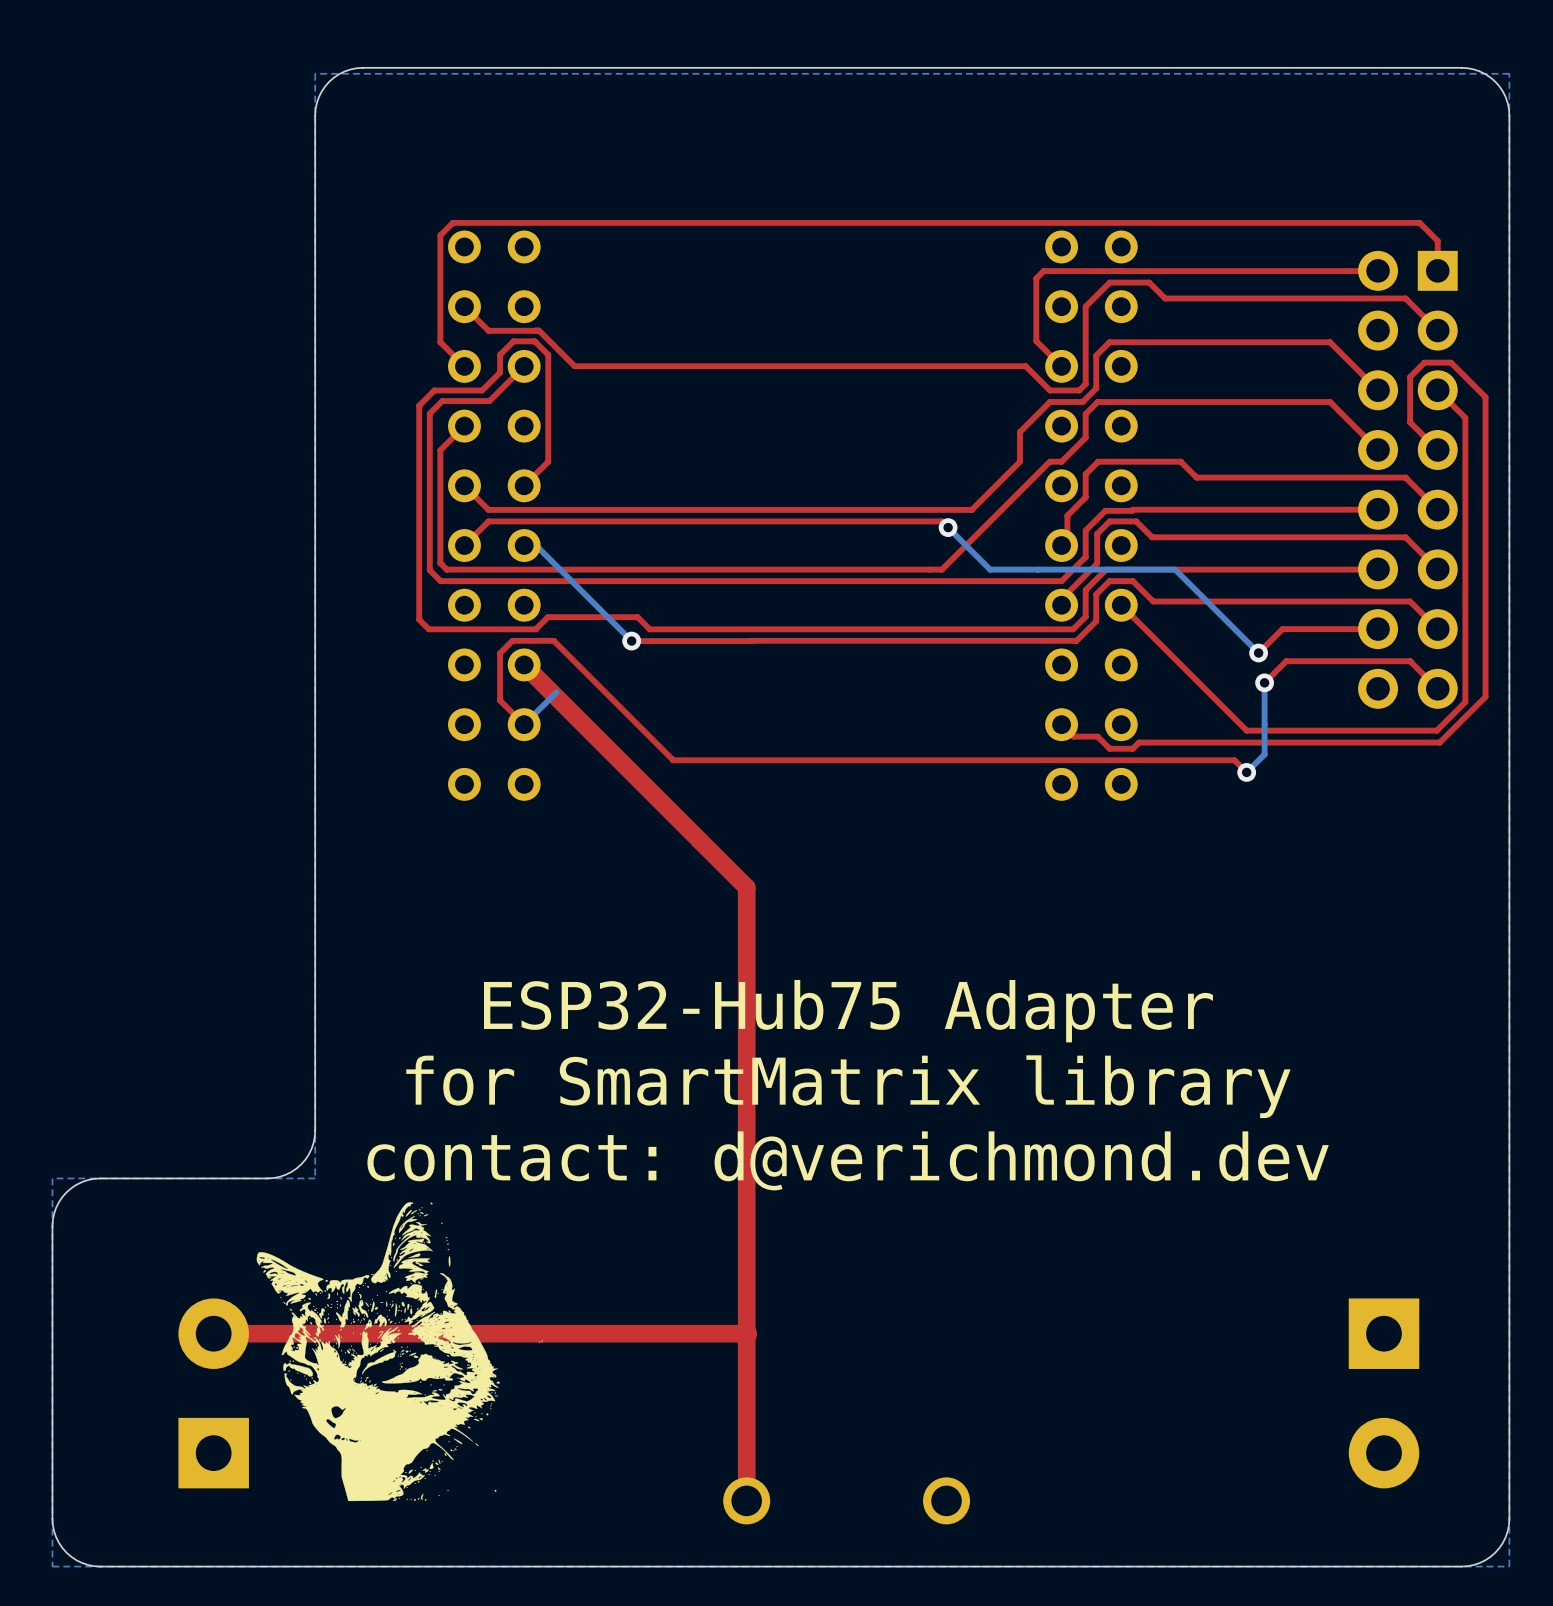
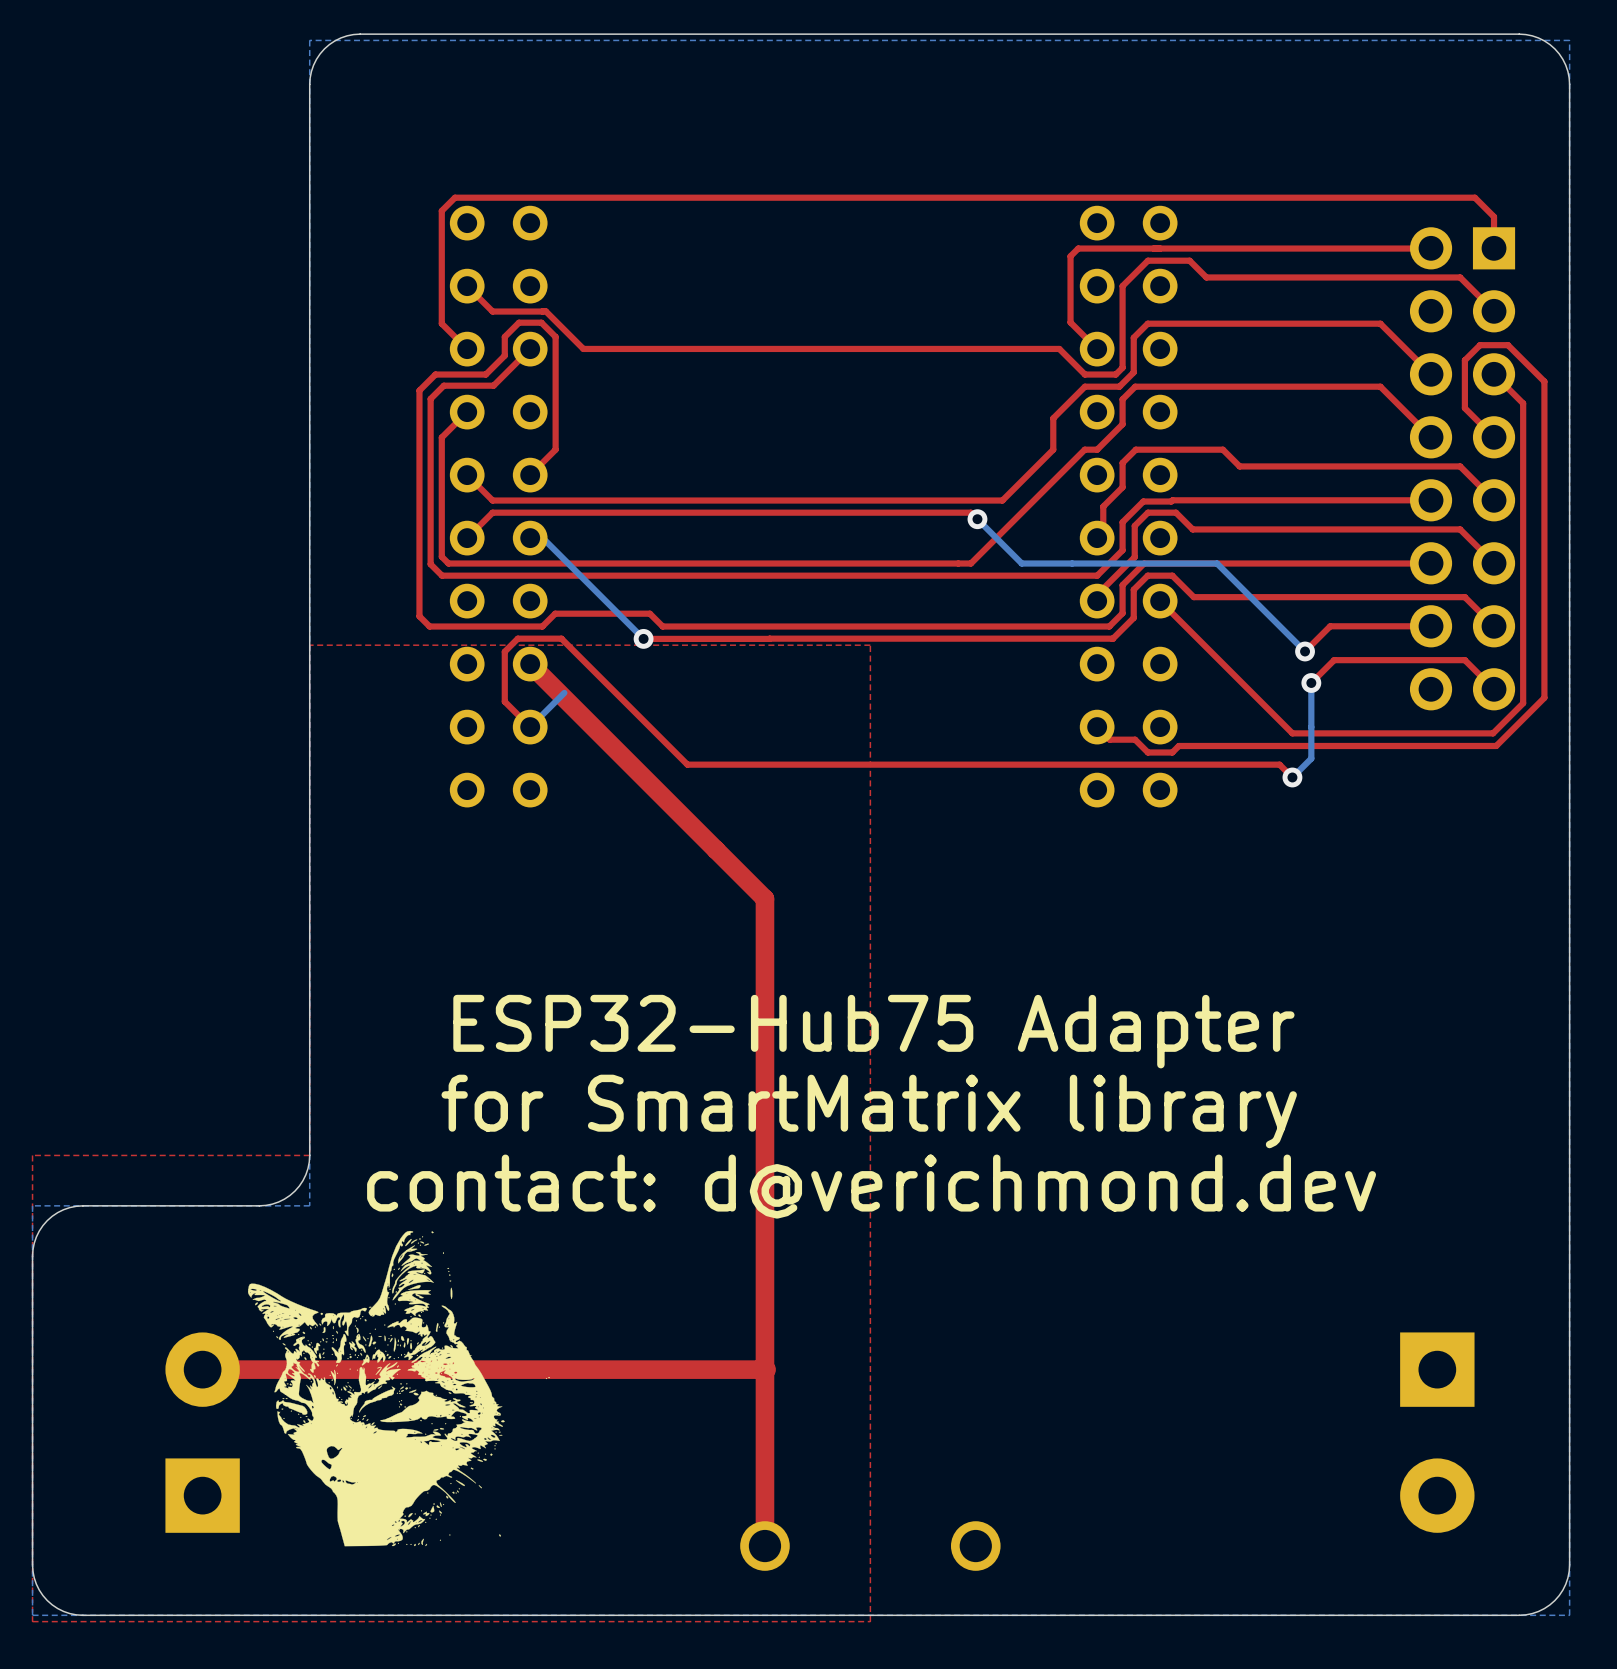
top zone outline: none -> (870, 645) (870, 1621) (32, 1621) (32, 1155) (309, 1155) (309, 645) (870, 645)

